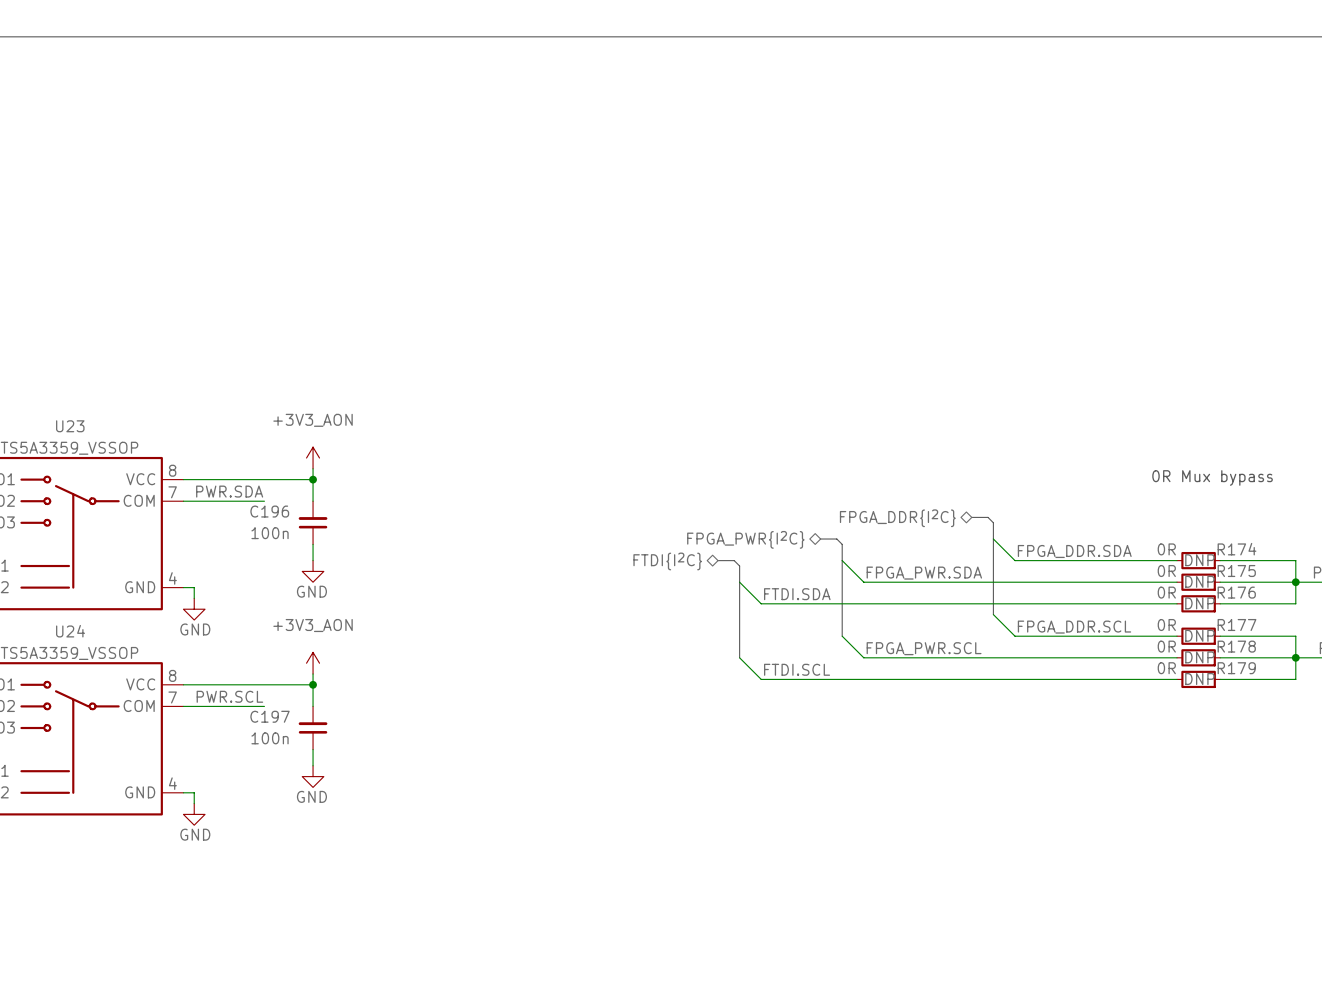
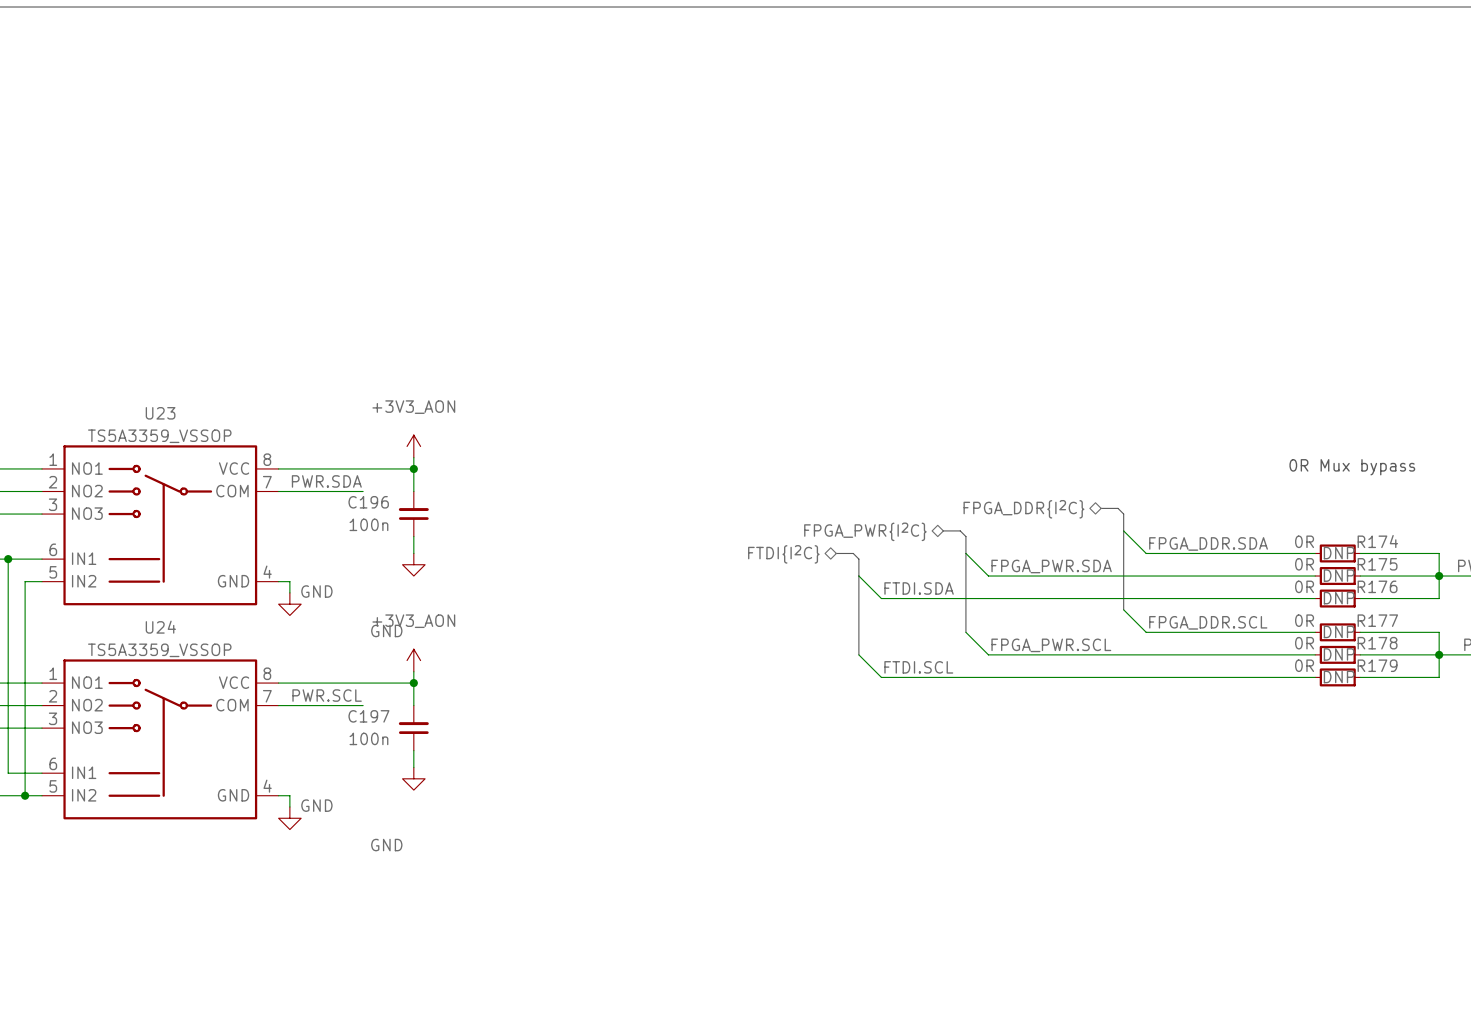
power symbol text position: GND (311, 591) -> GND (316, 591)
power symbol text position: GND (195, 629) -> GND (386, 630)
power symbol text position: GND (311, 796) -> GND (316, 805)
power symbol text position: GND (195, 834) -> GND (386, 845)

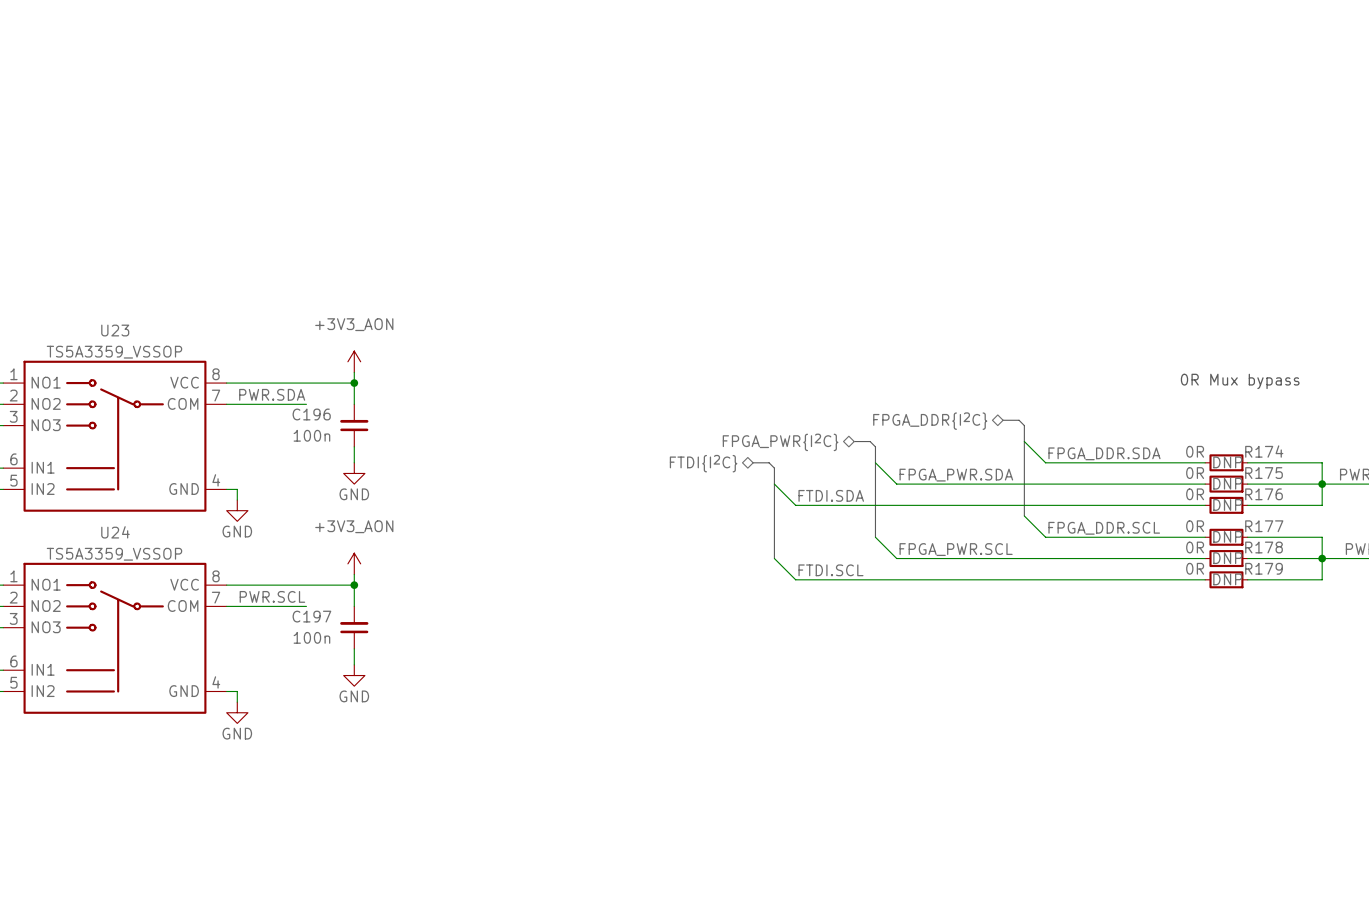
power symbol text position: GND (316, 591) -> GND (354, 494)
power symbol text position: GND (386, 630) -> GND (237, 531)
power symbol text position: GND (316, 805) -> GND (354, 696)
power symbol text position: GND (386, 845) -> GND (237, 733)

